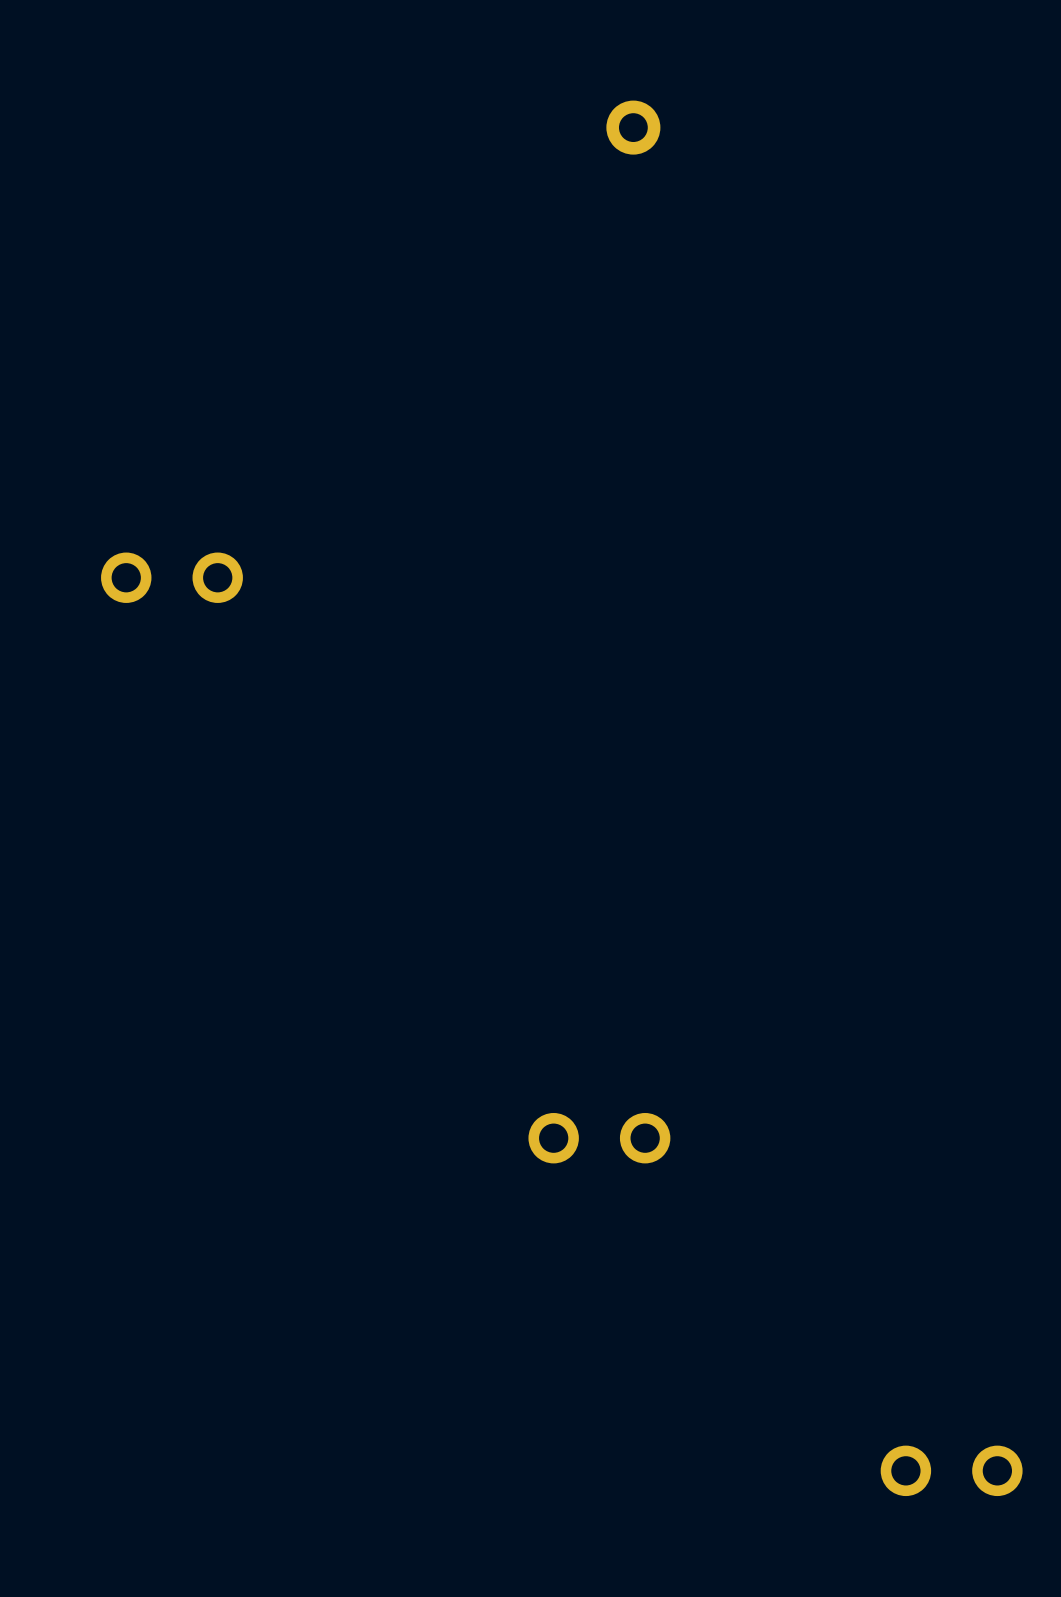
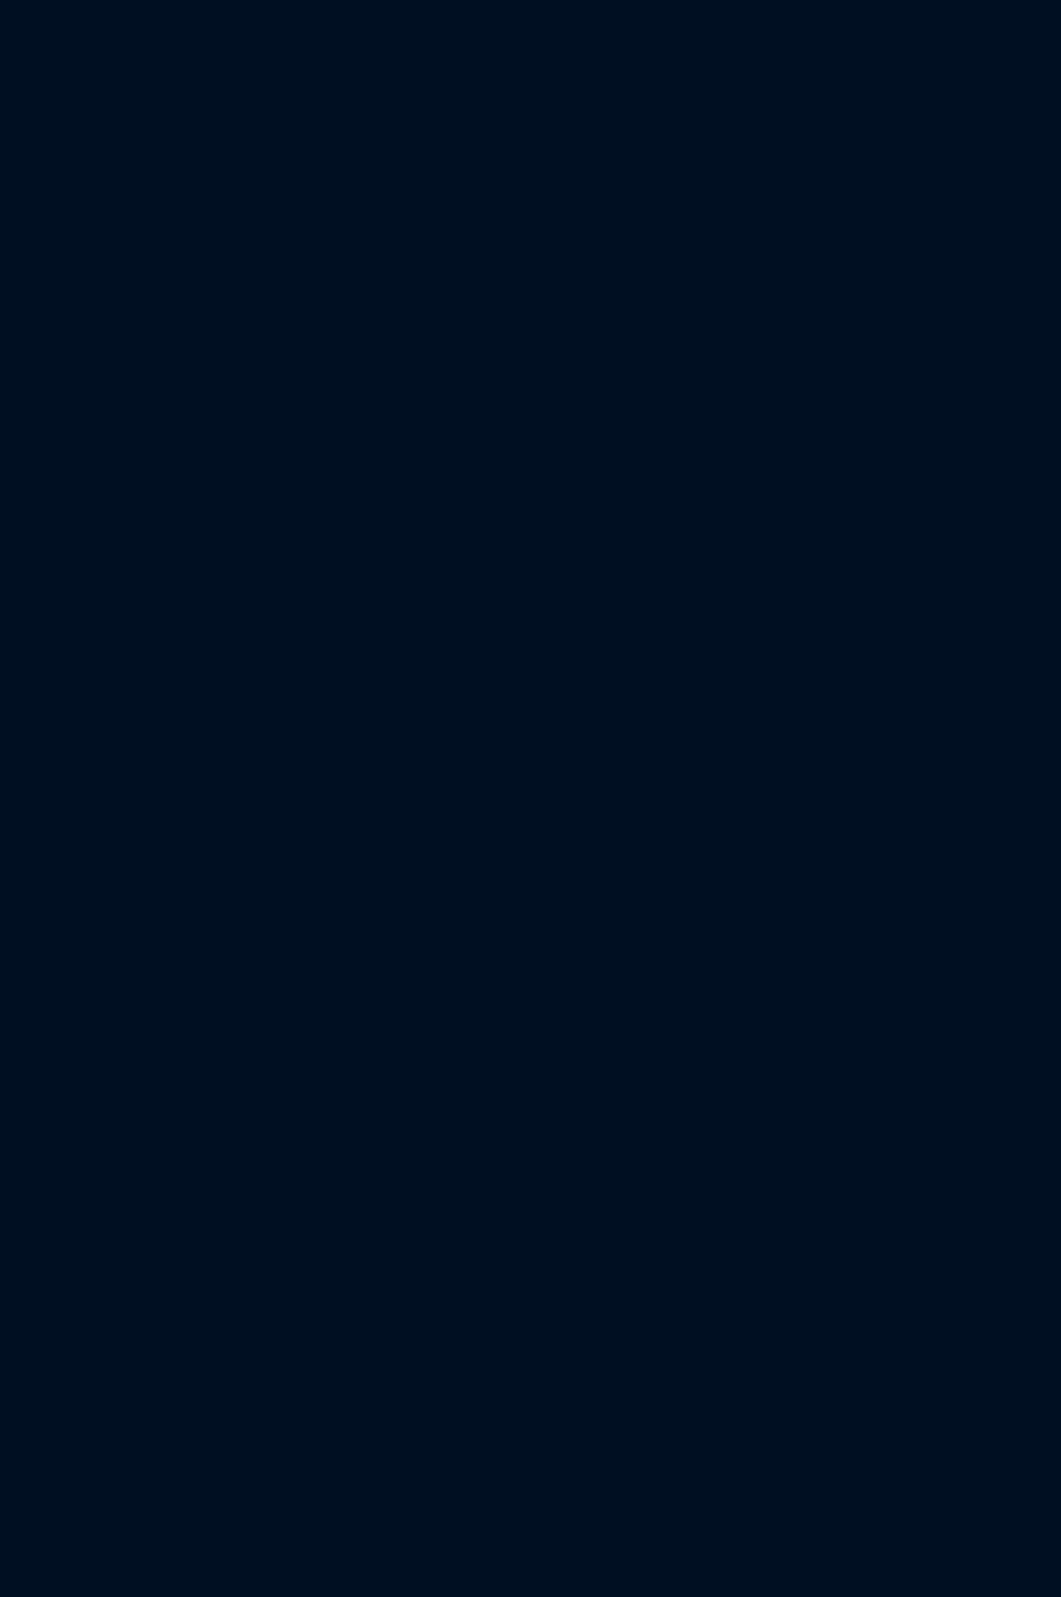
part: (633, 127) -> none
part: (171, 577) -> none
part: (599, 1138) -> none
part: (951, 1470) -> none

